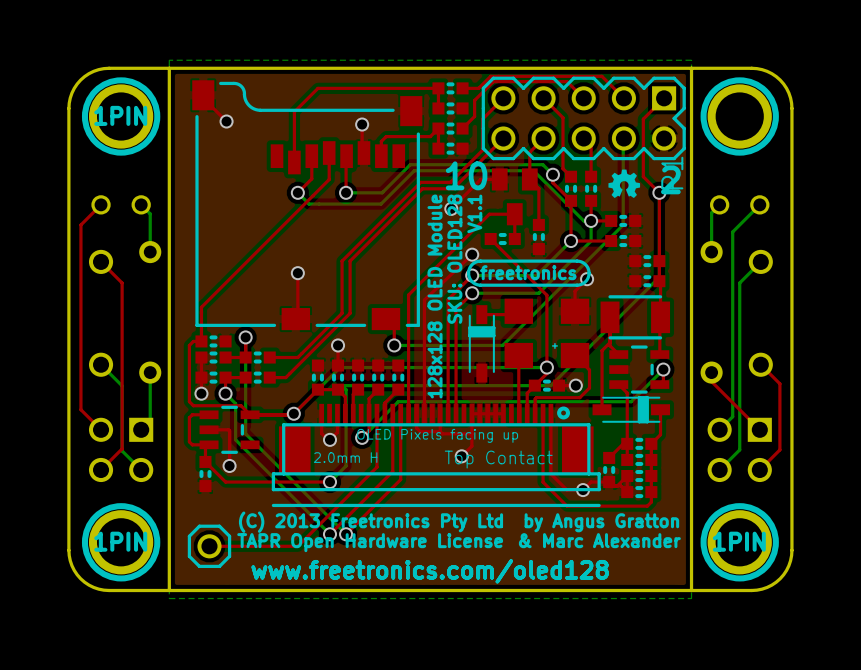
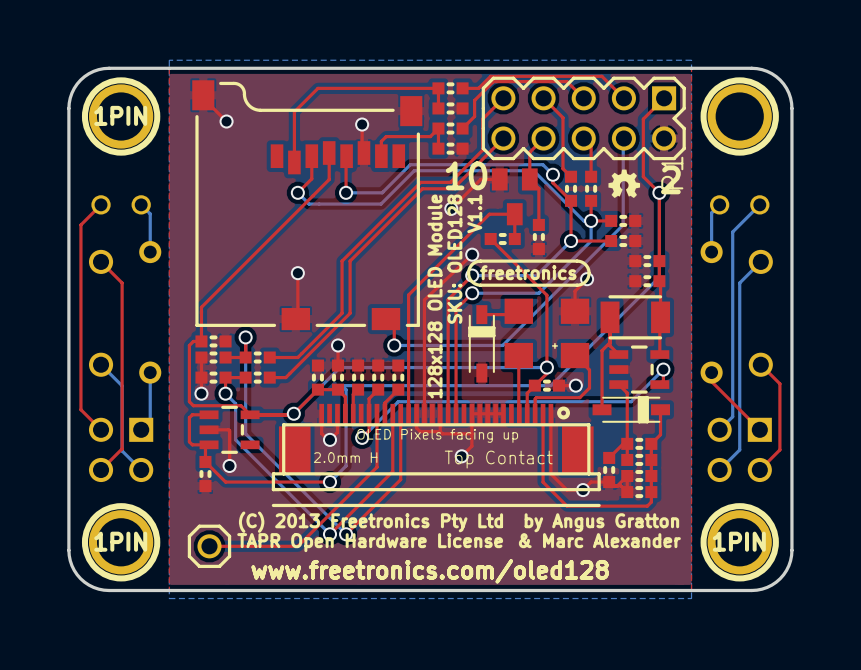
board edge: (169, 68) (169, 590) -> none
board edge: (691, 68) (691, 590) -> none

